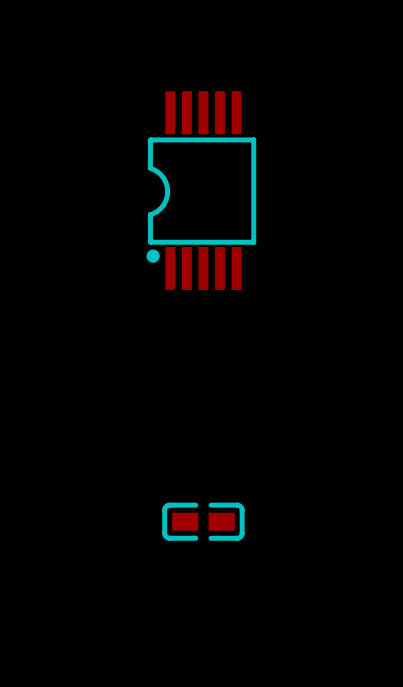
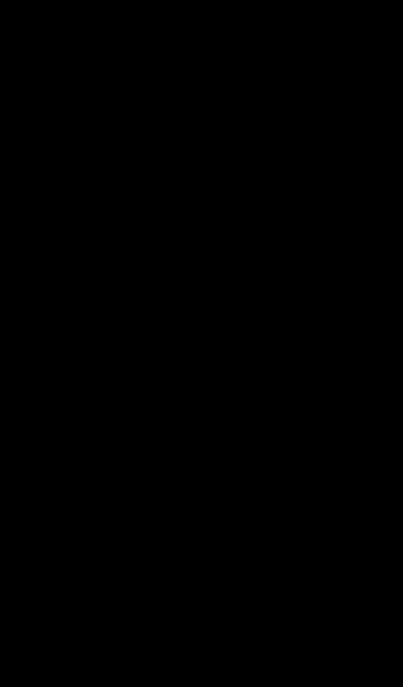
part: (201, 190) -> none
part: (203, 521) -> none

